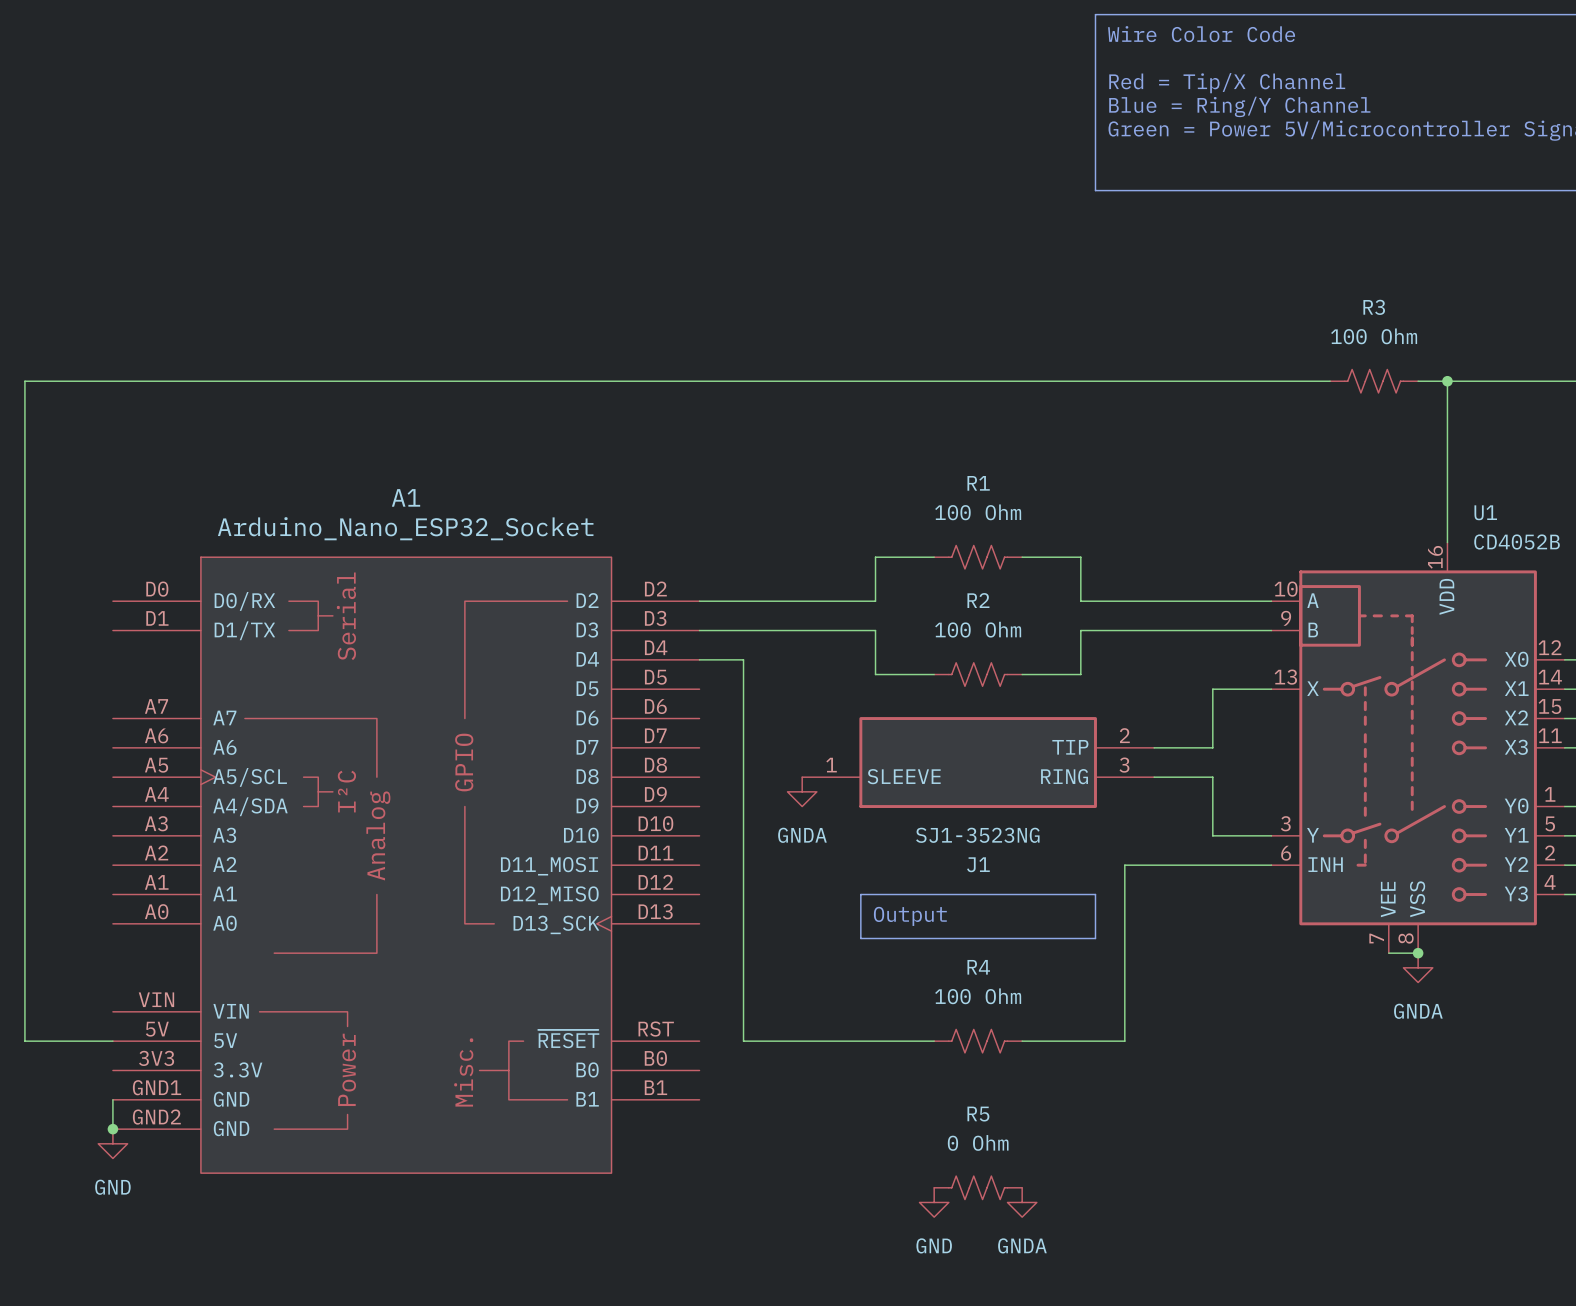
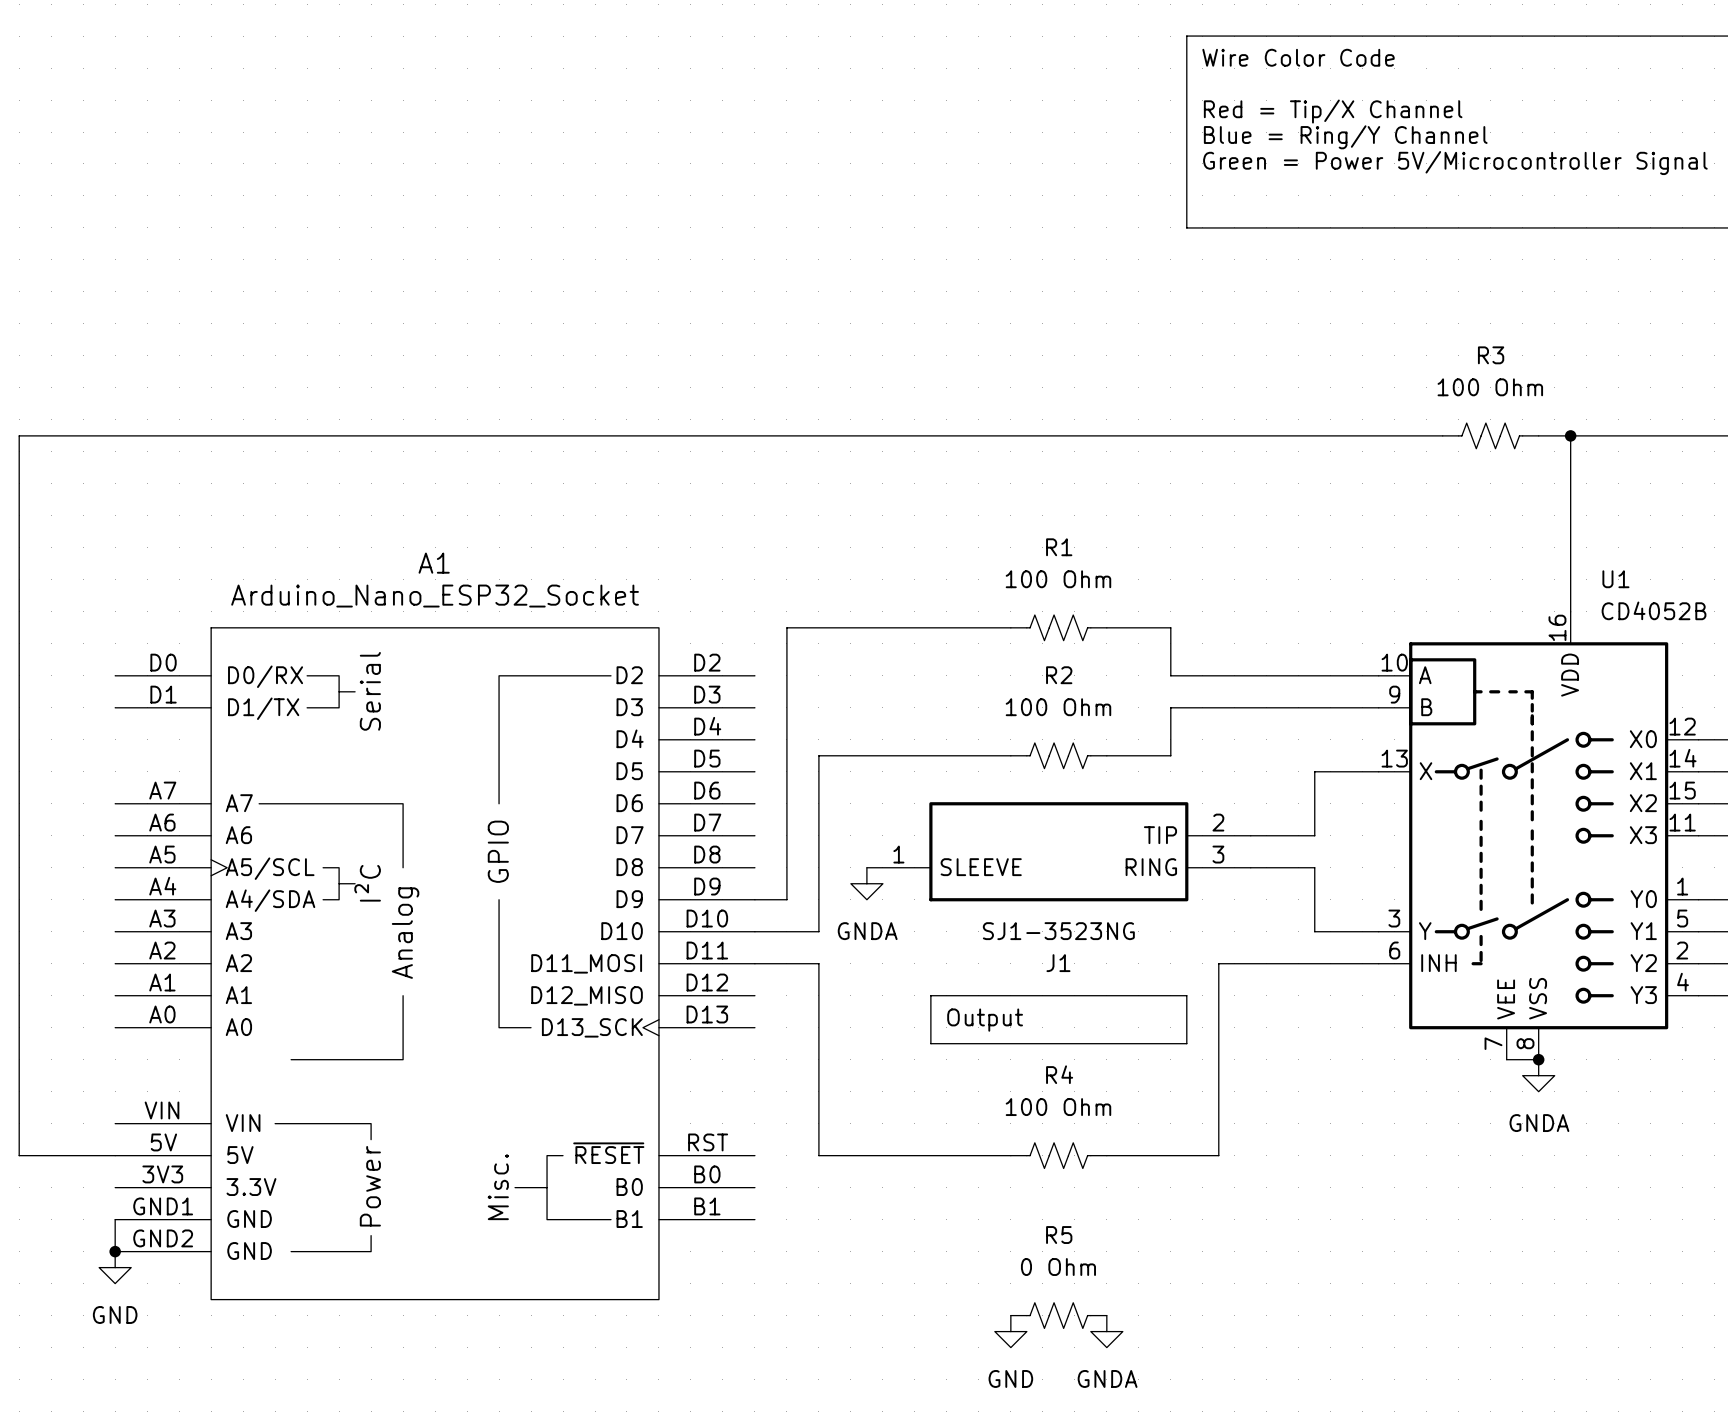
wire: (875, 557) (875, 601) (699, 601) -> (946, 627) (786, 627) (786, 899) (754, 899)
wire: (699, 630) (875, 630) (875, 674) -> (754, 931) (818, 931) (818, 755) (946, 755)
wire: (699, 659) (743, 659) (743, 1041) (758, 1041) -> (754, 963) (818, 963) (818, 1155)

